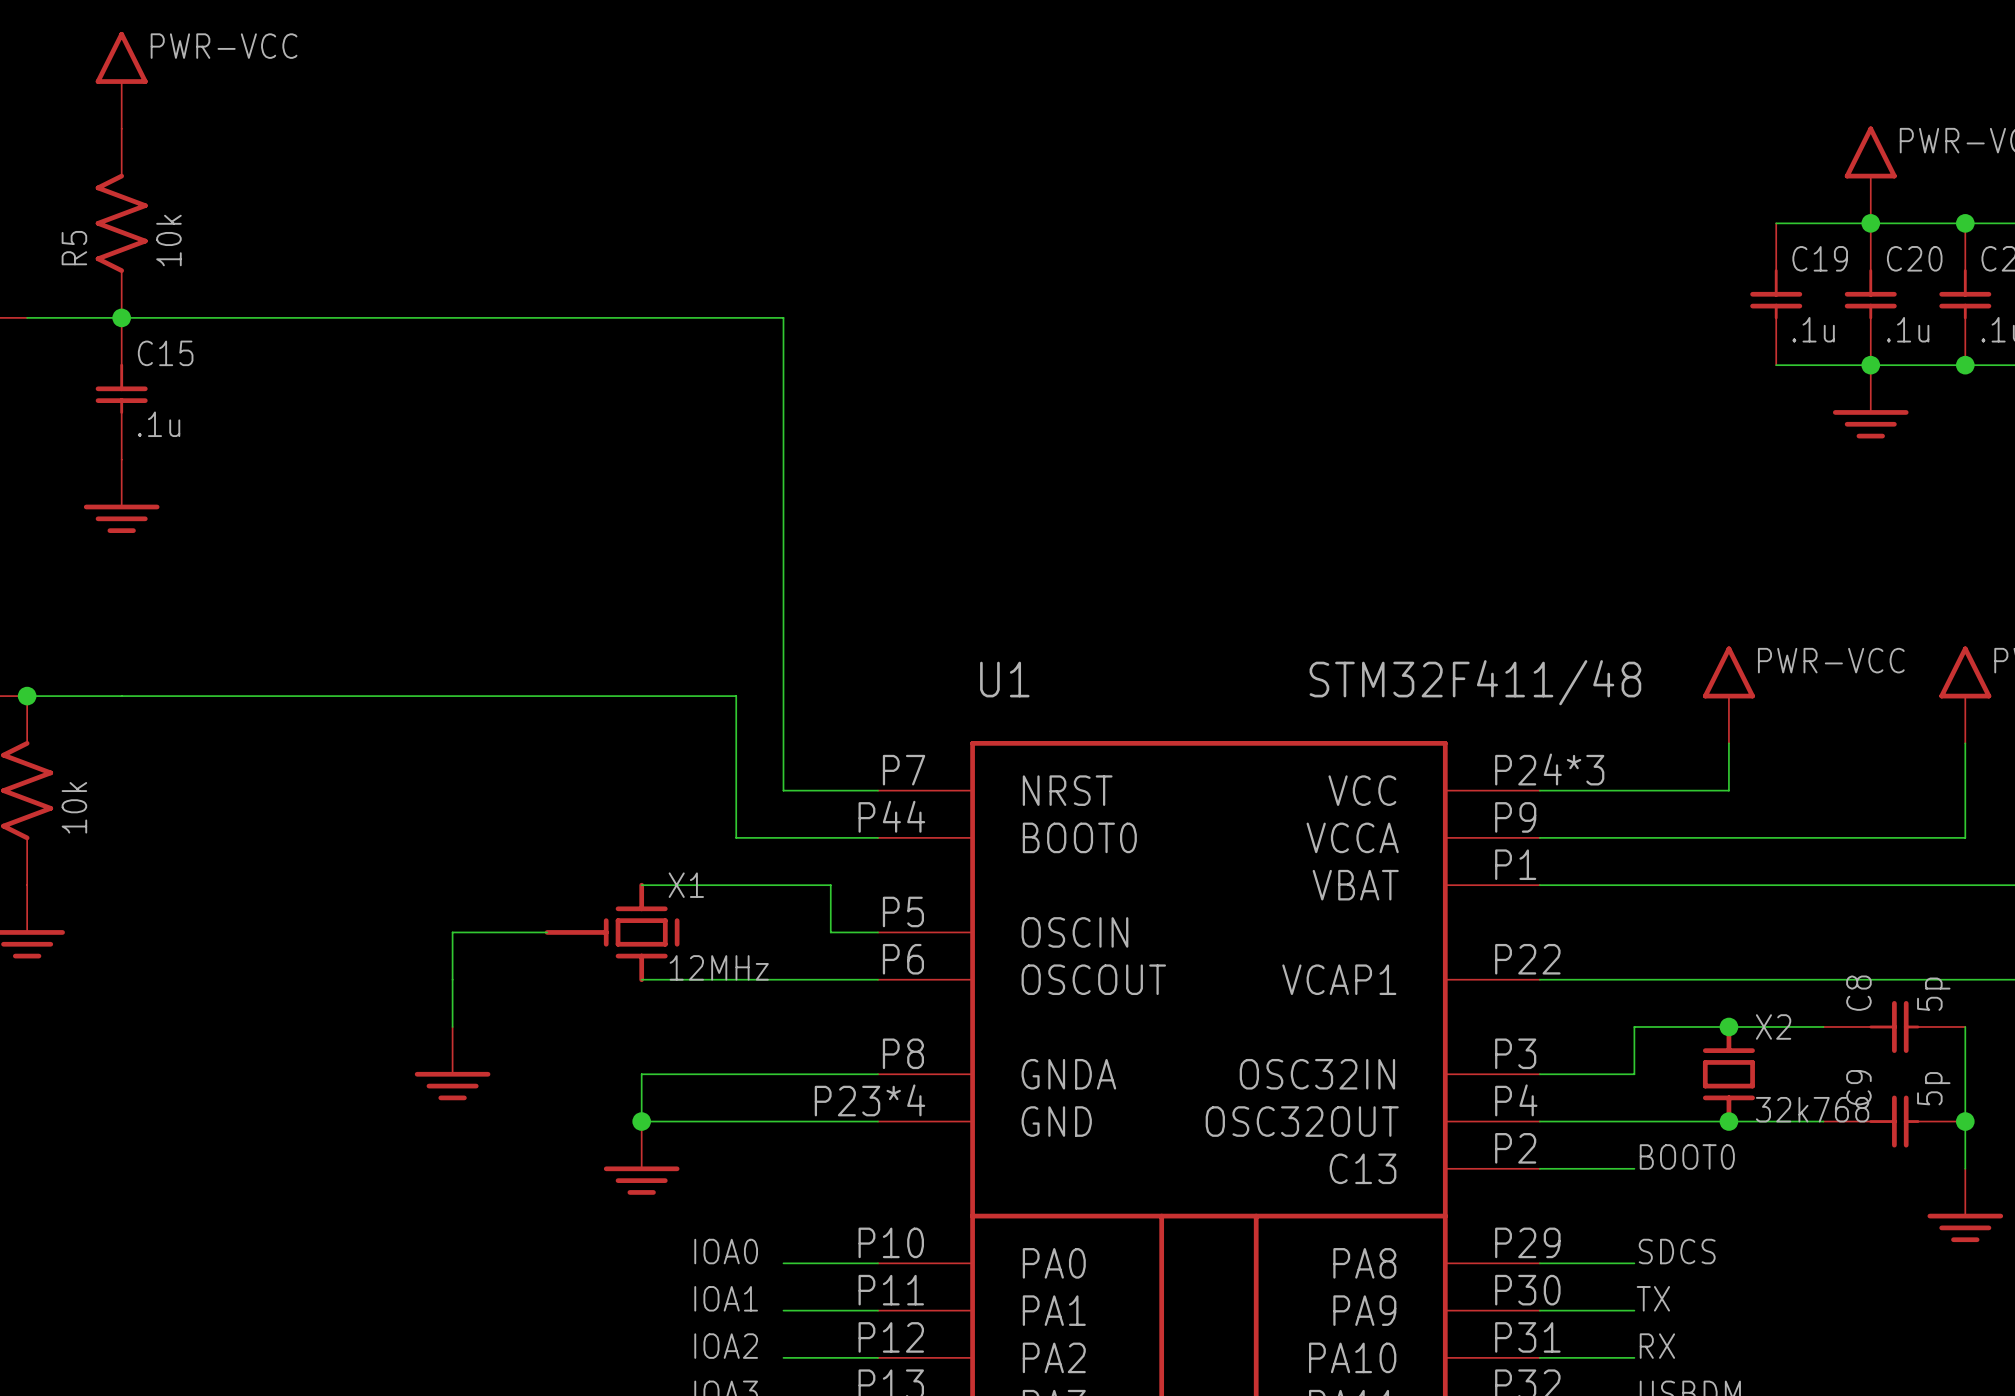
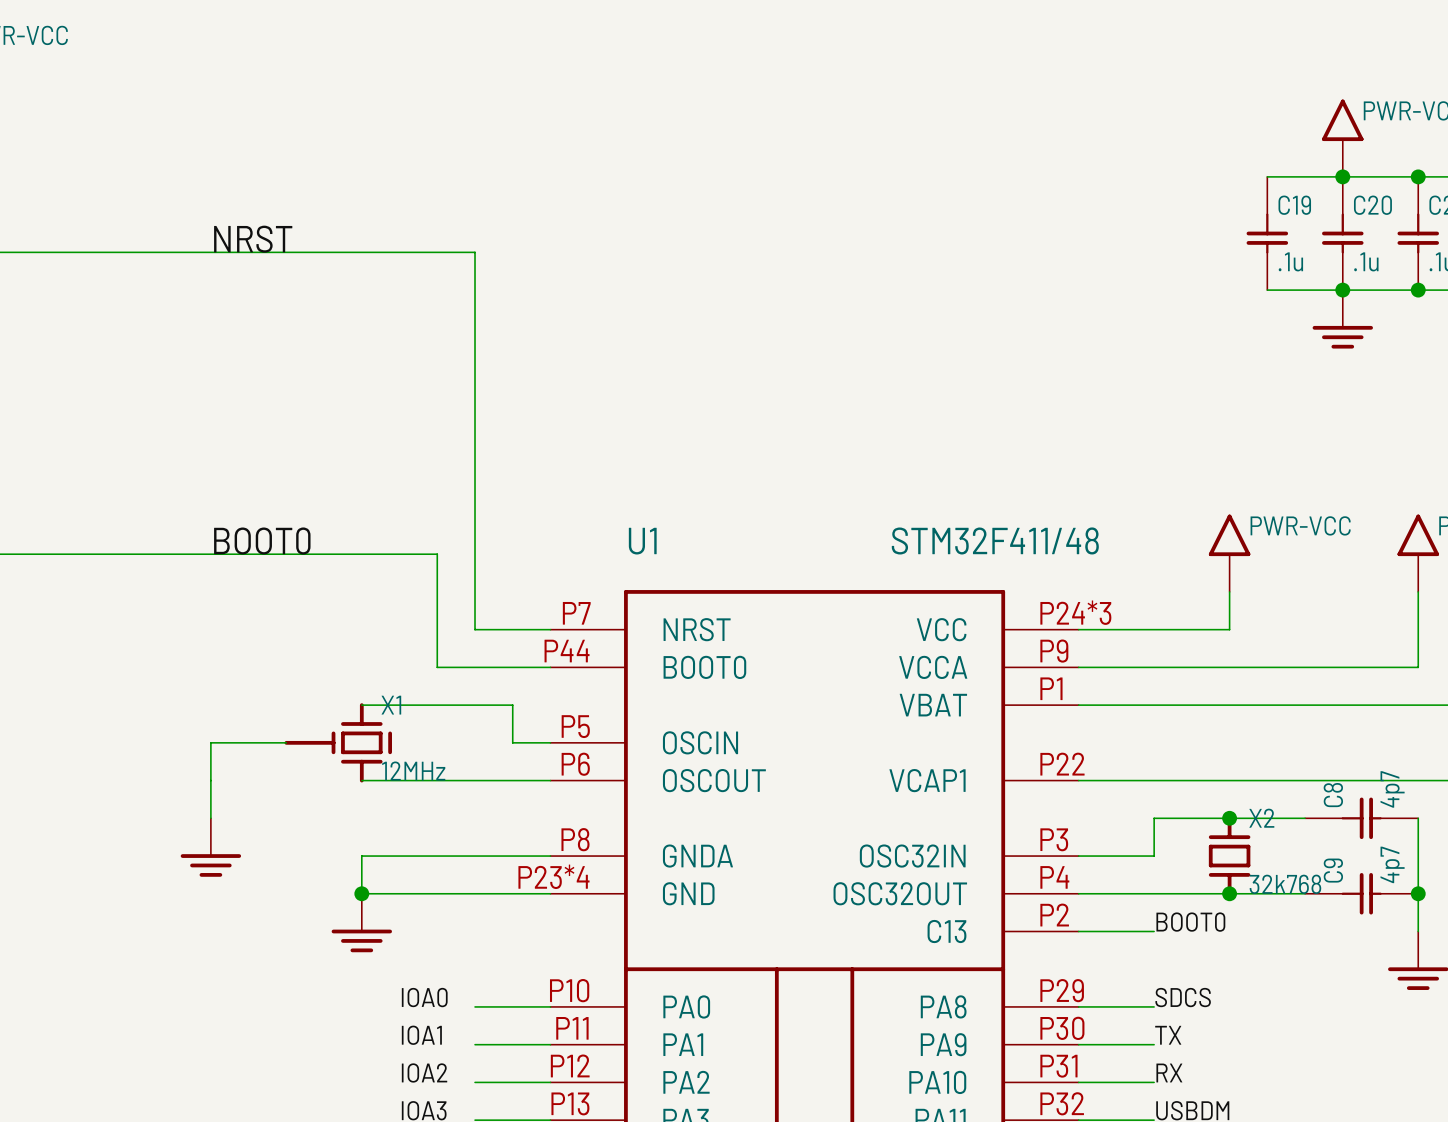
label: none -> NRST (253, 239)
label: none -> BOOT0 (262, 541)
C8 value: 5p (1933, 994) -> 4p7 (1392, 789)
C9 value: 5p (1933, 1088) -> 4p7 (1392, 864)

